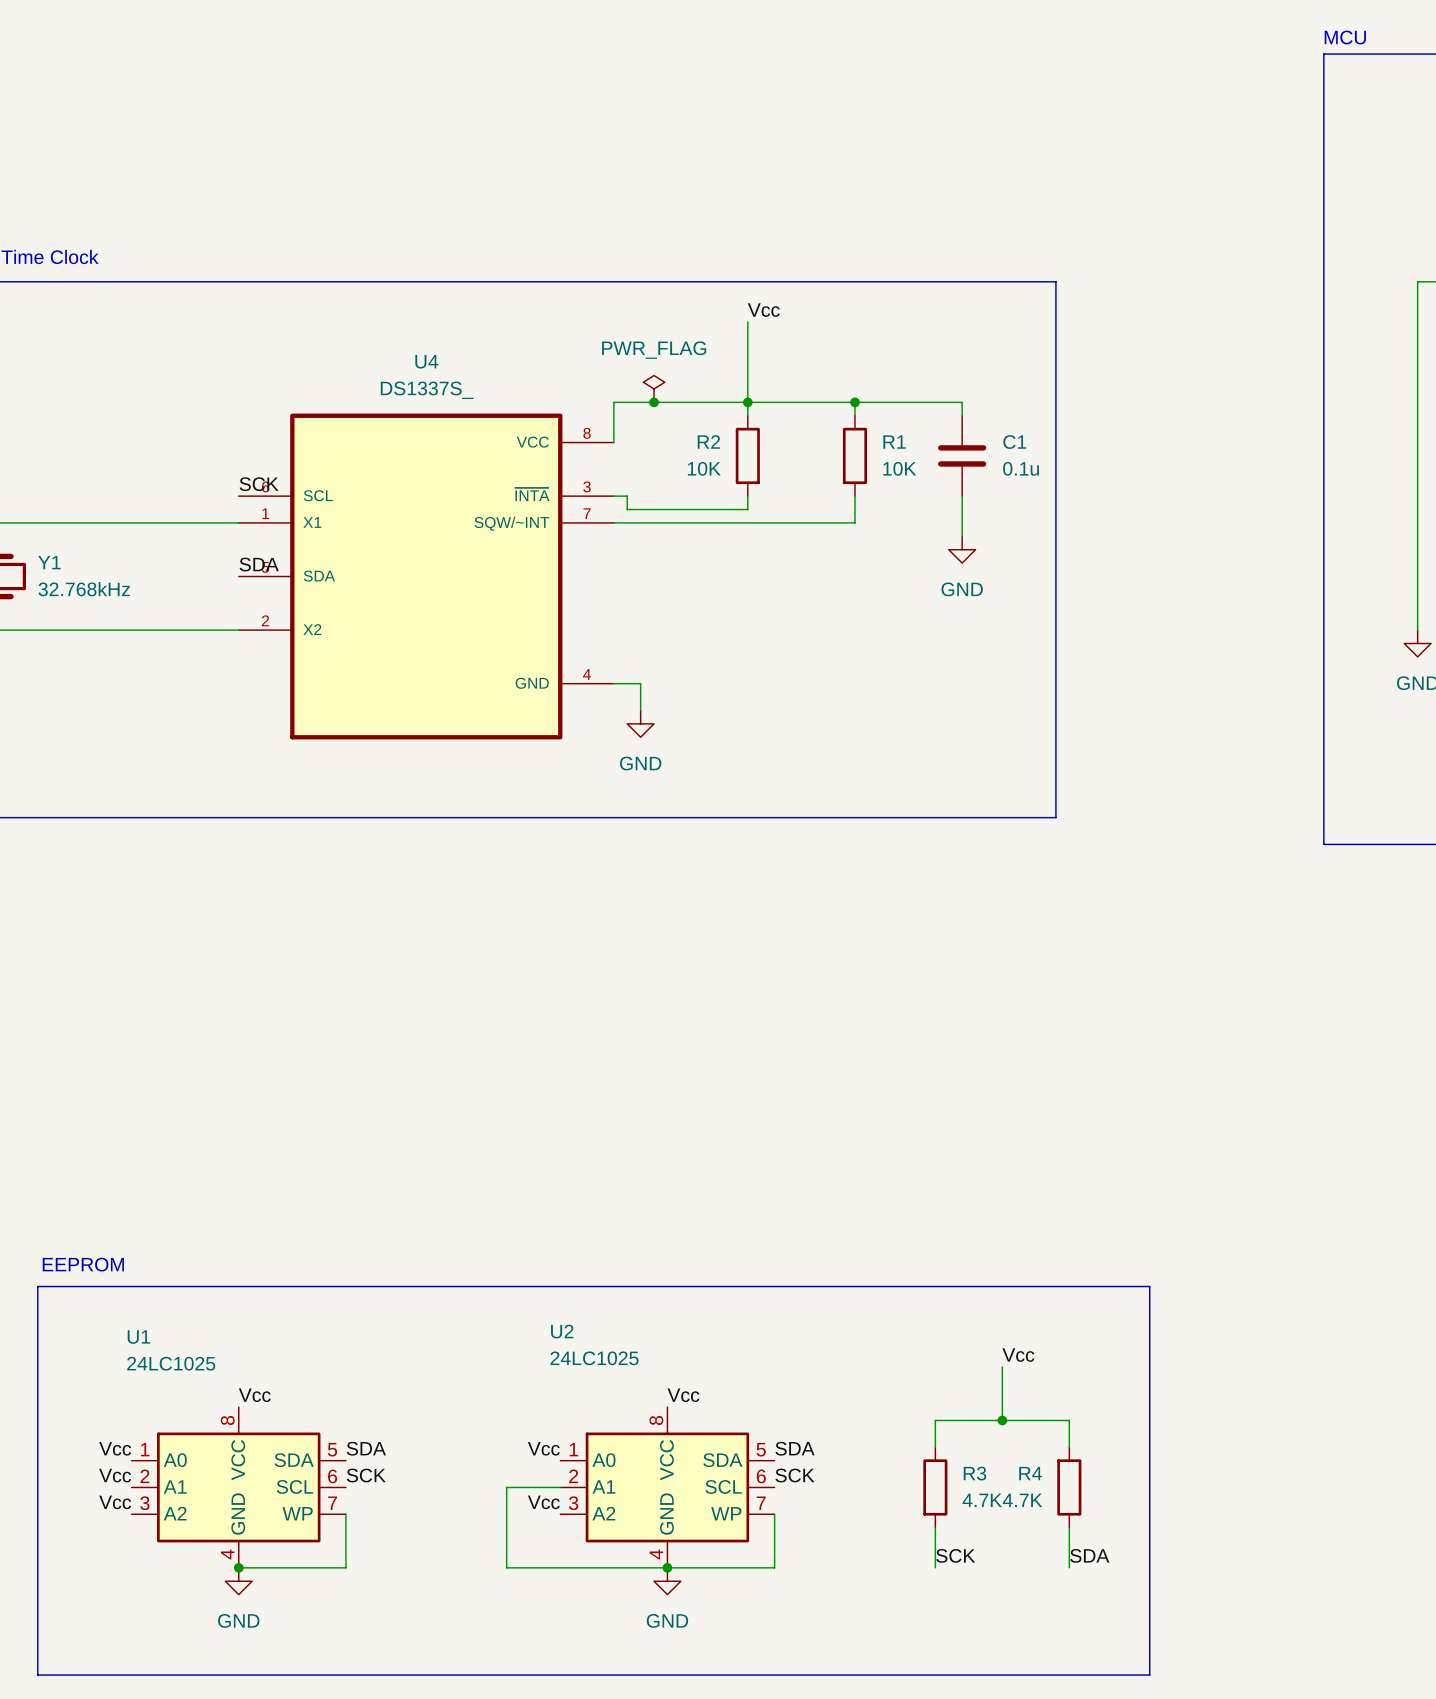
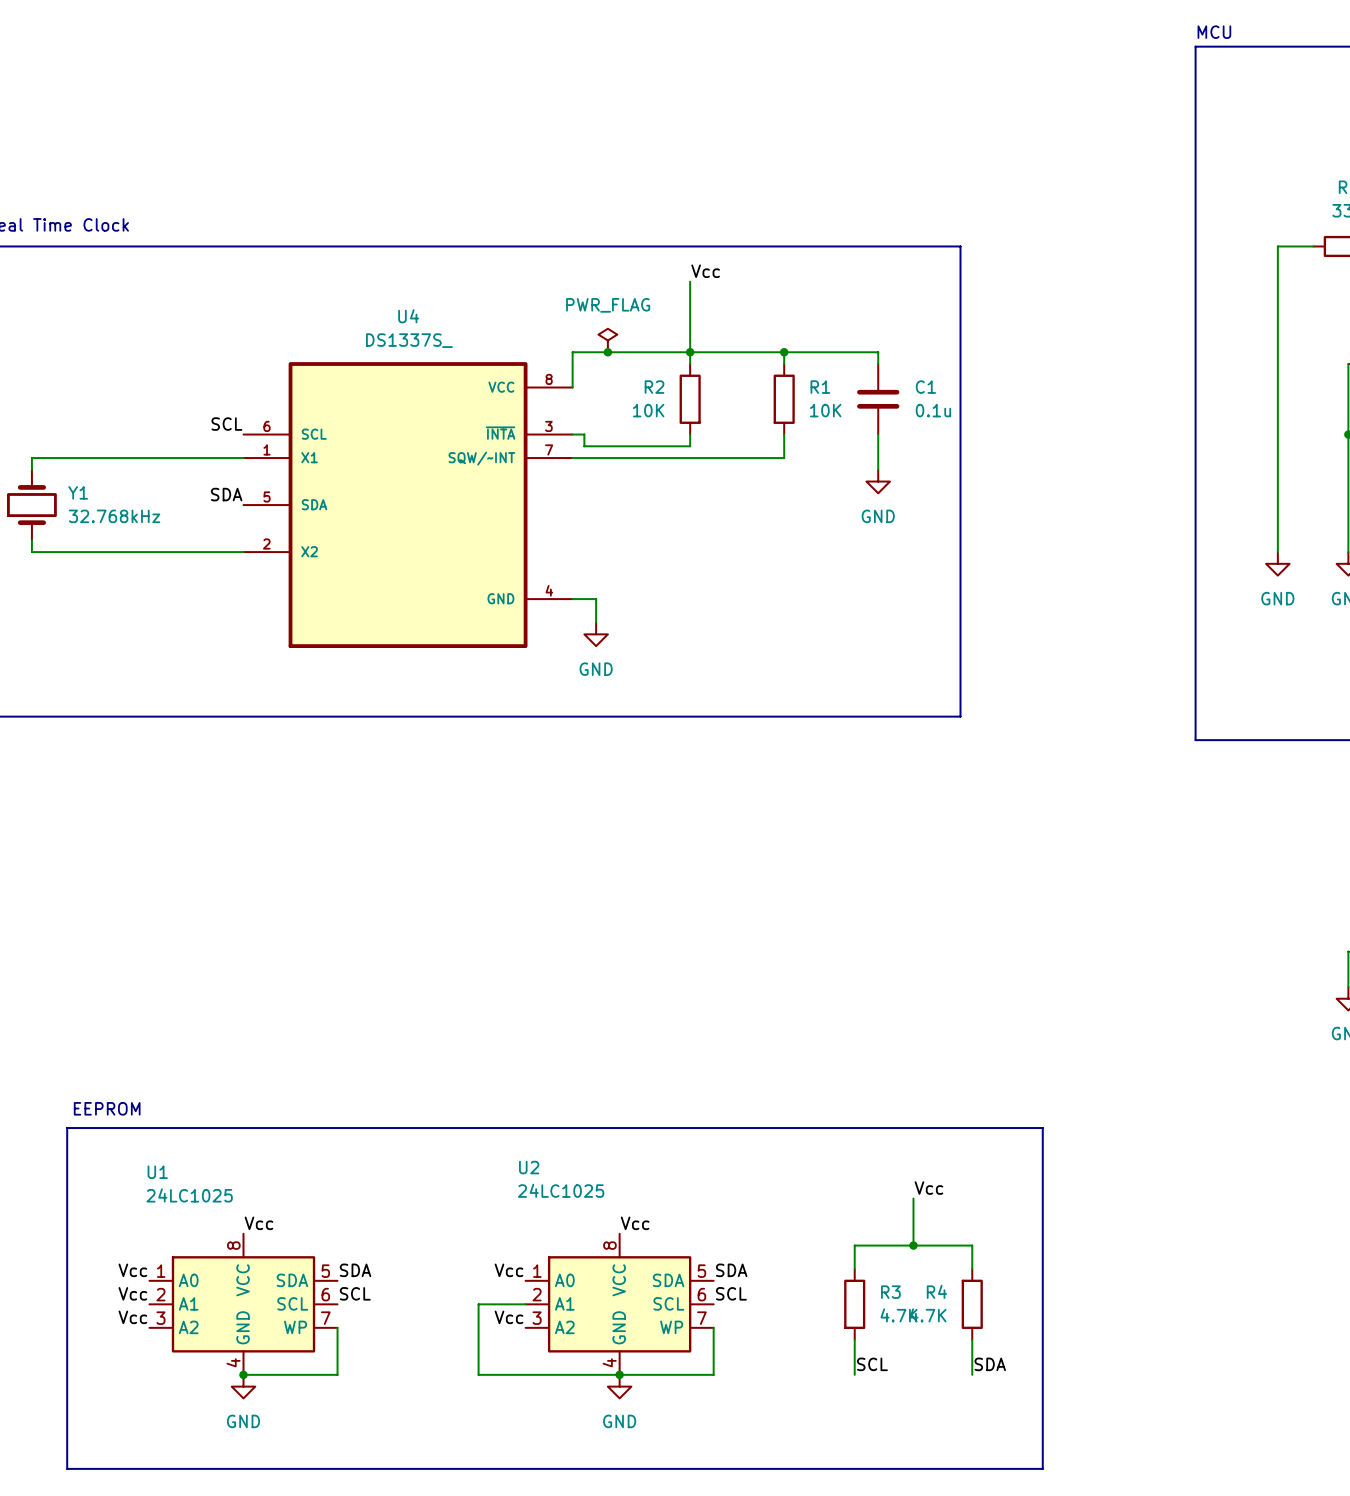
label: SCK (259, 484) -> SCL (226, 424)
label position: SDA (259, 564) -> SDA (226, 494)
label: SCK (366, 1475) -> SCL (355, 1293)
label: SCK (794, 1475) -> SCL (731, 1293)
label: SCK (955, 1555) -> SCL (872, 1364)

